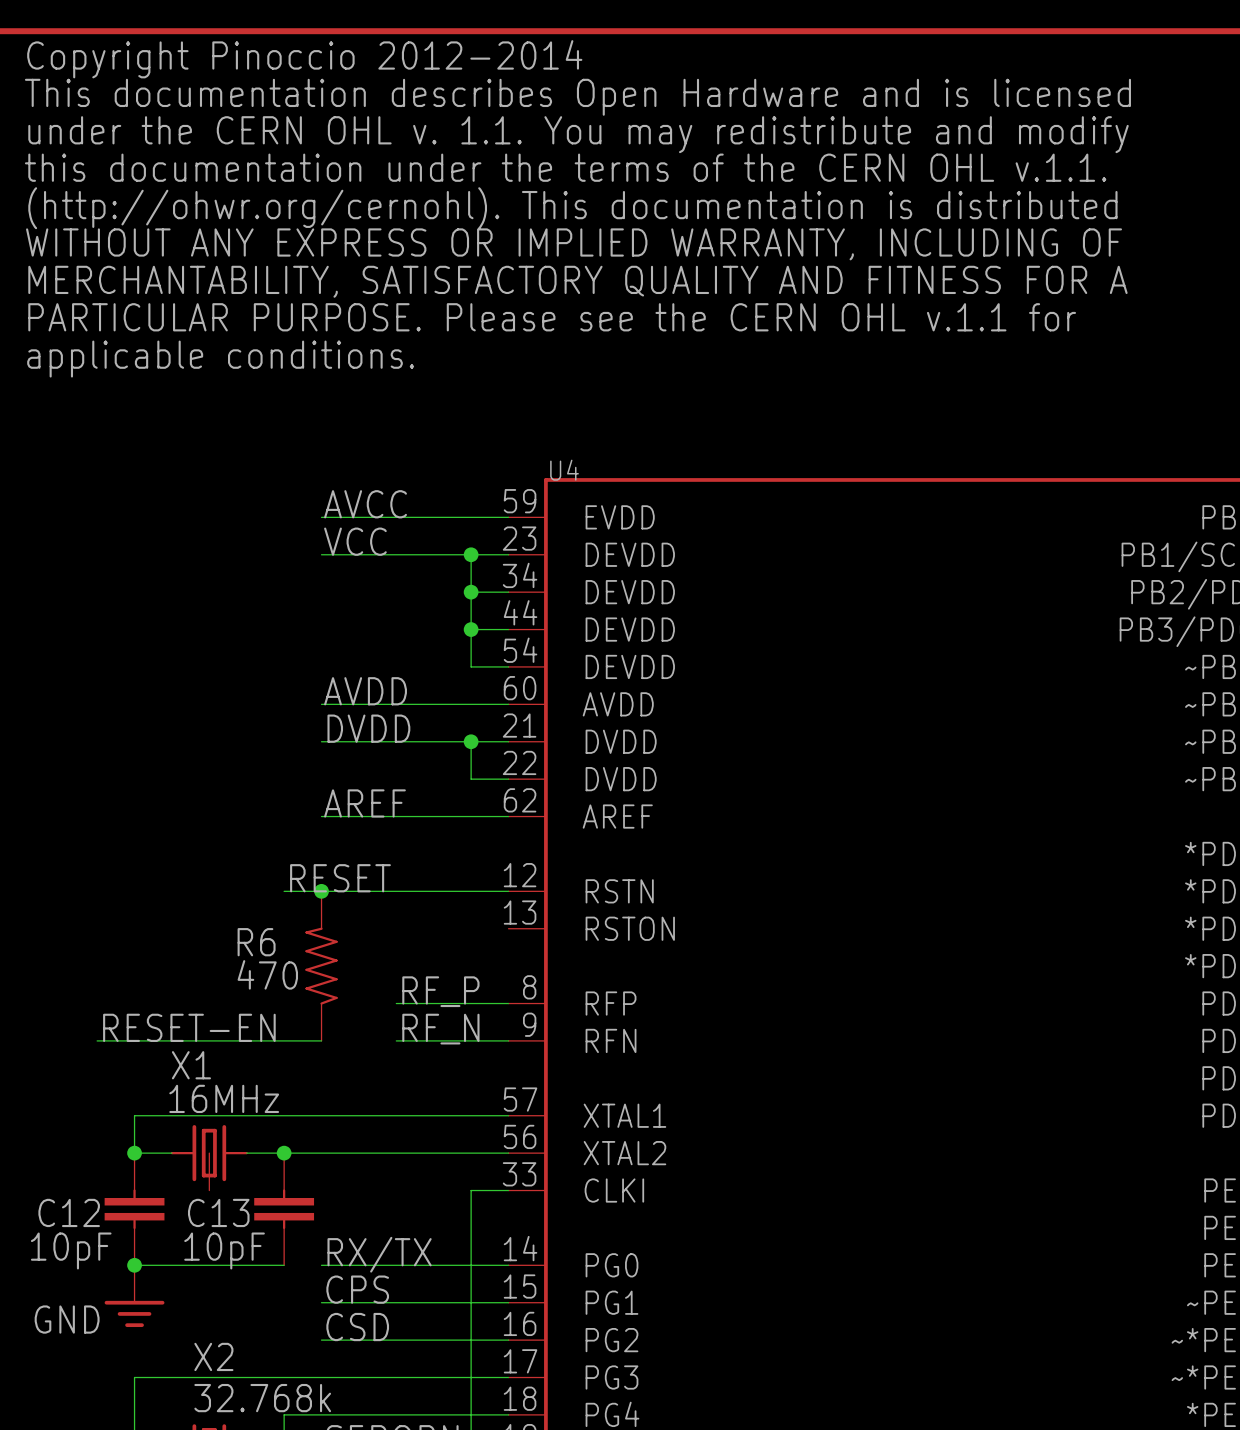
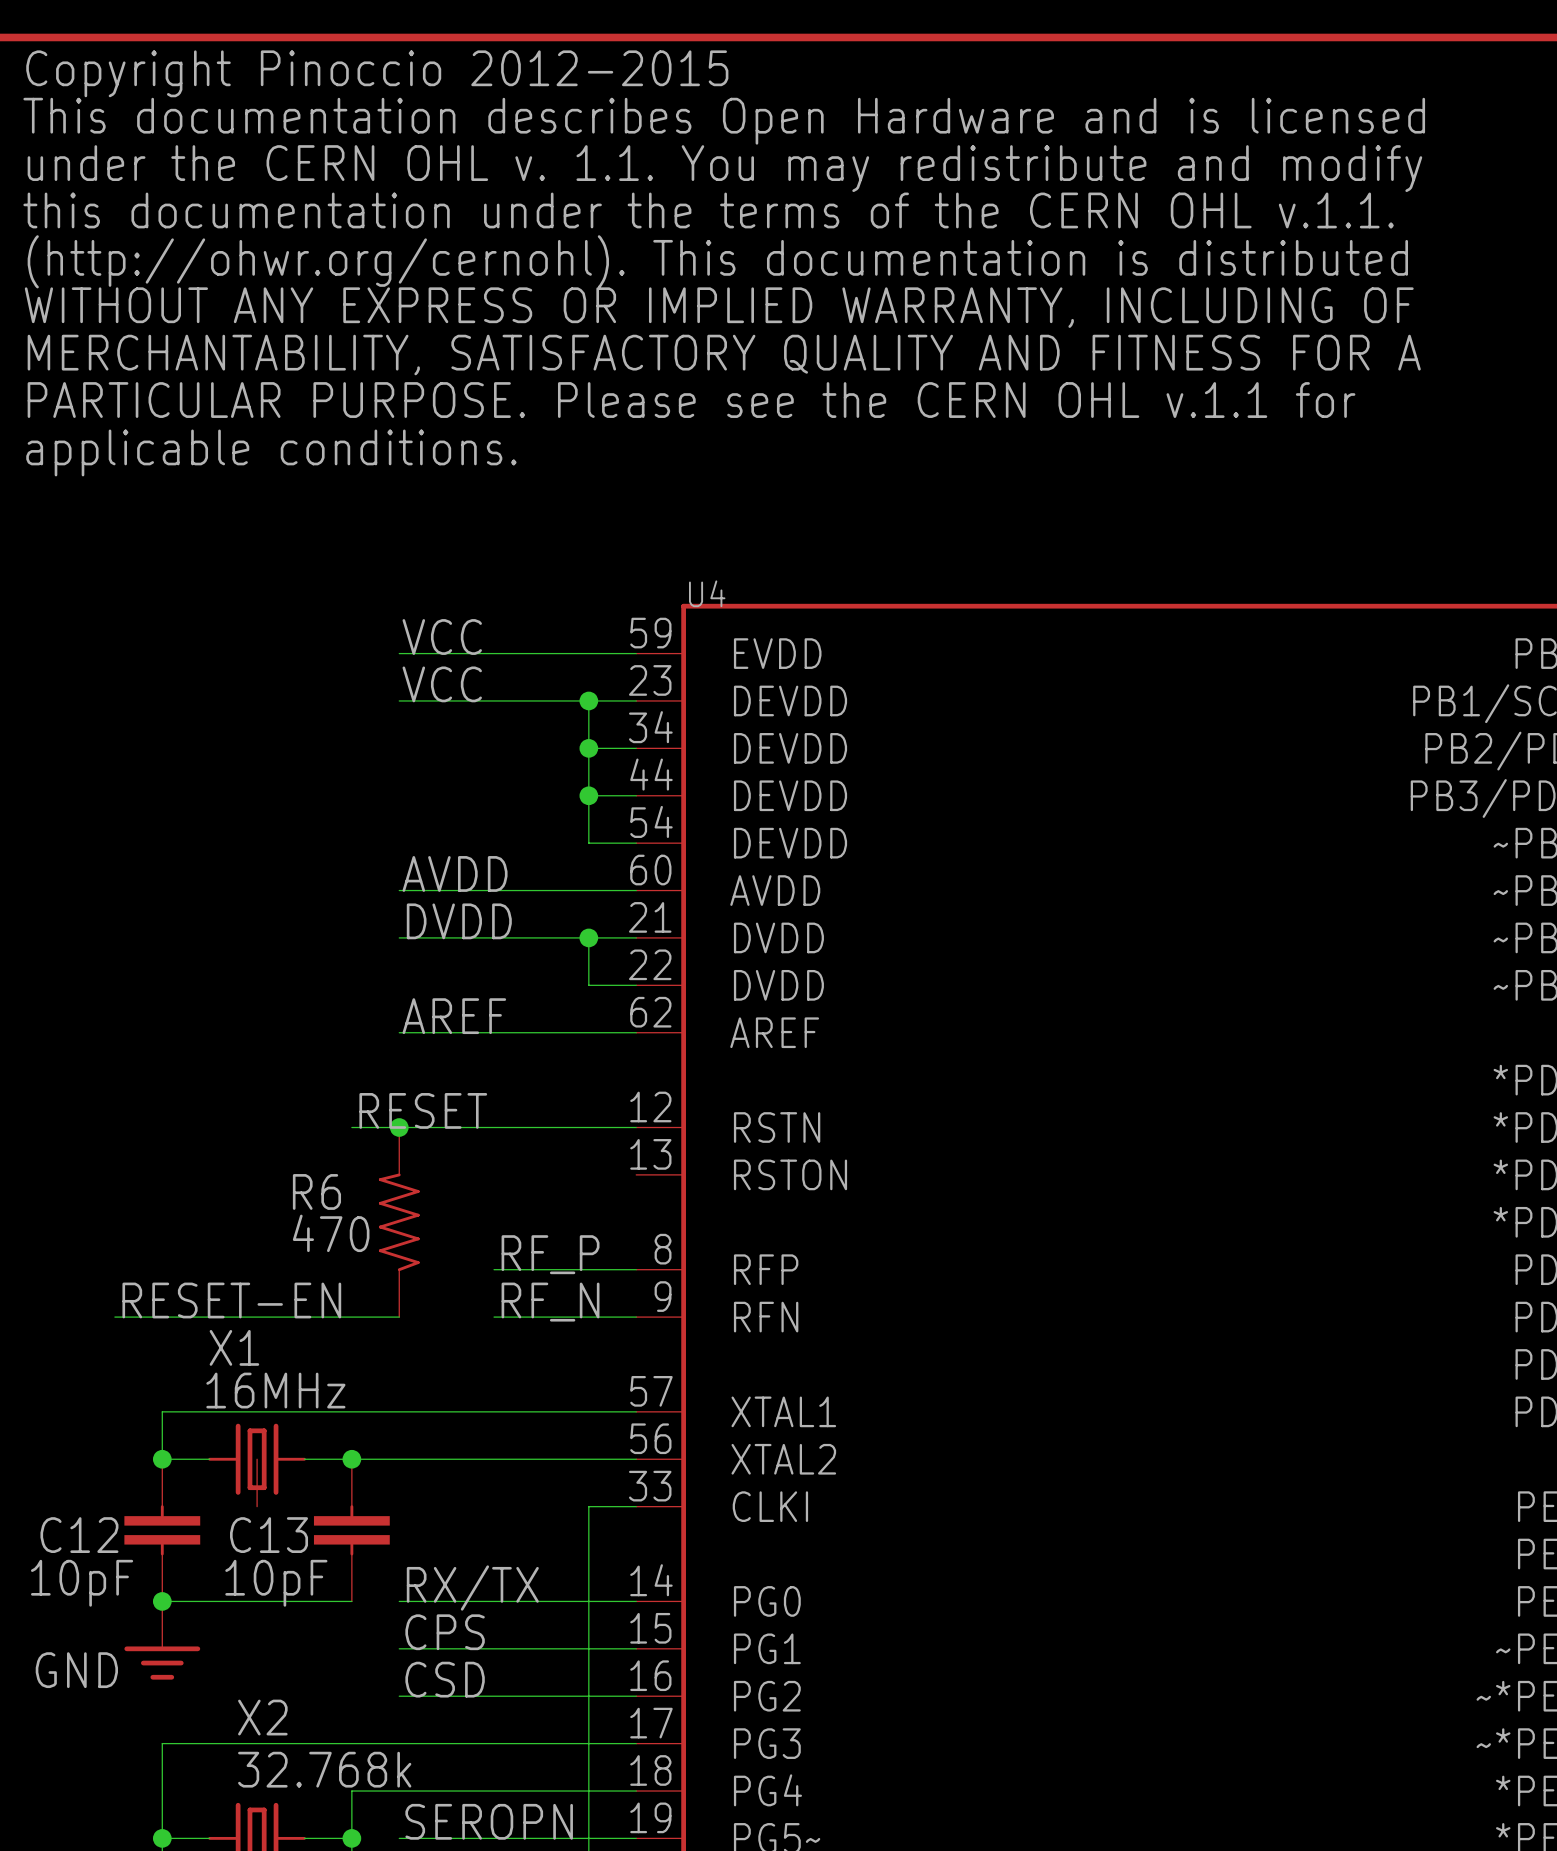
text: Copyright Pinoccio 2012-2014 (304, 59) -> Copyright Pinoccio 2012-2015 (377, 73)
label: AVCC (365, 504) -> VCC (442, 637)

